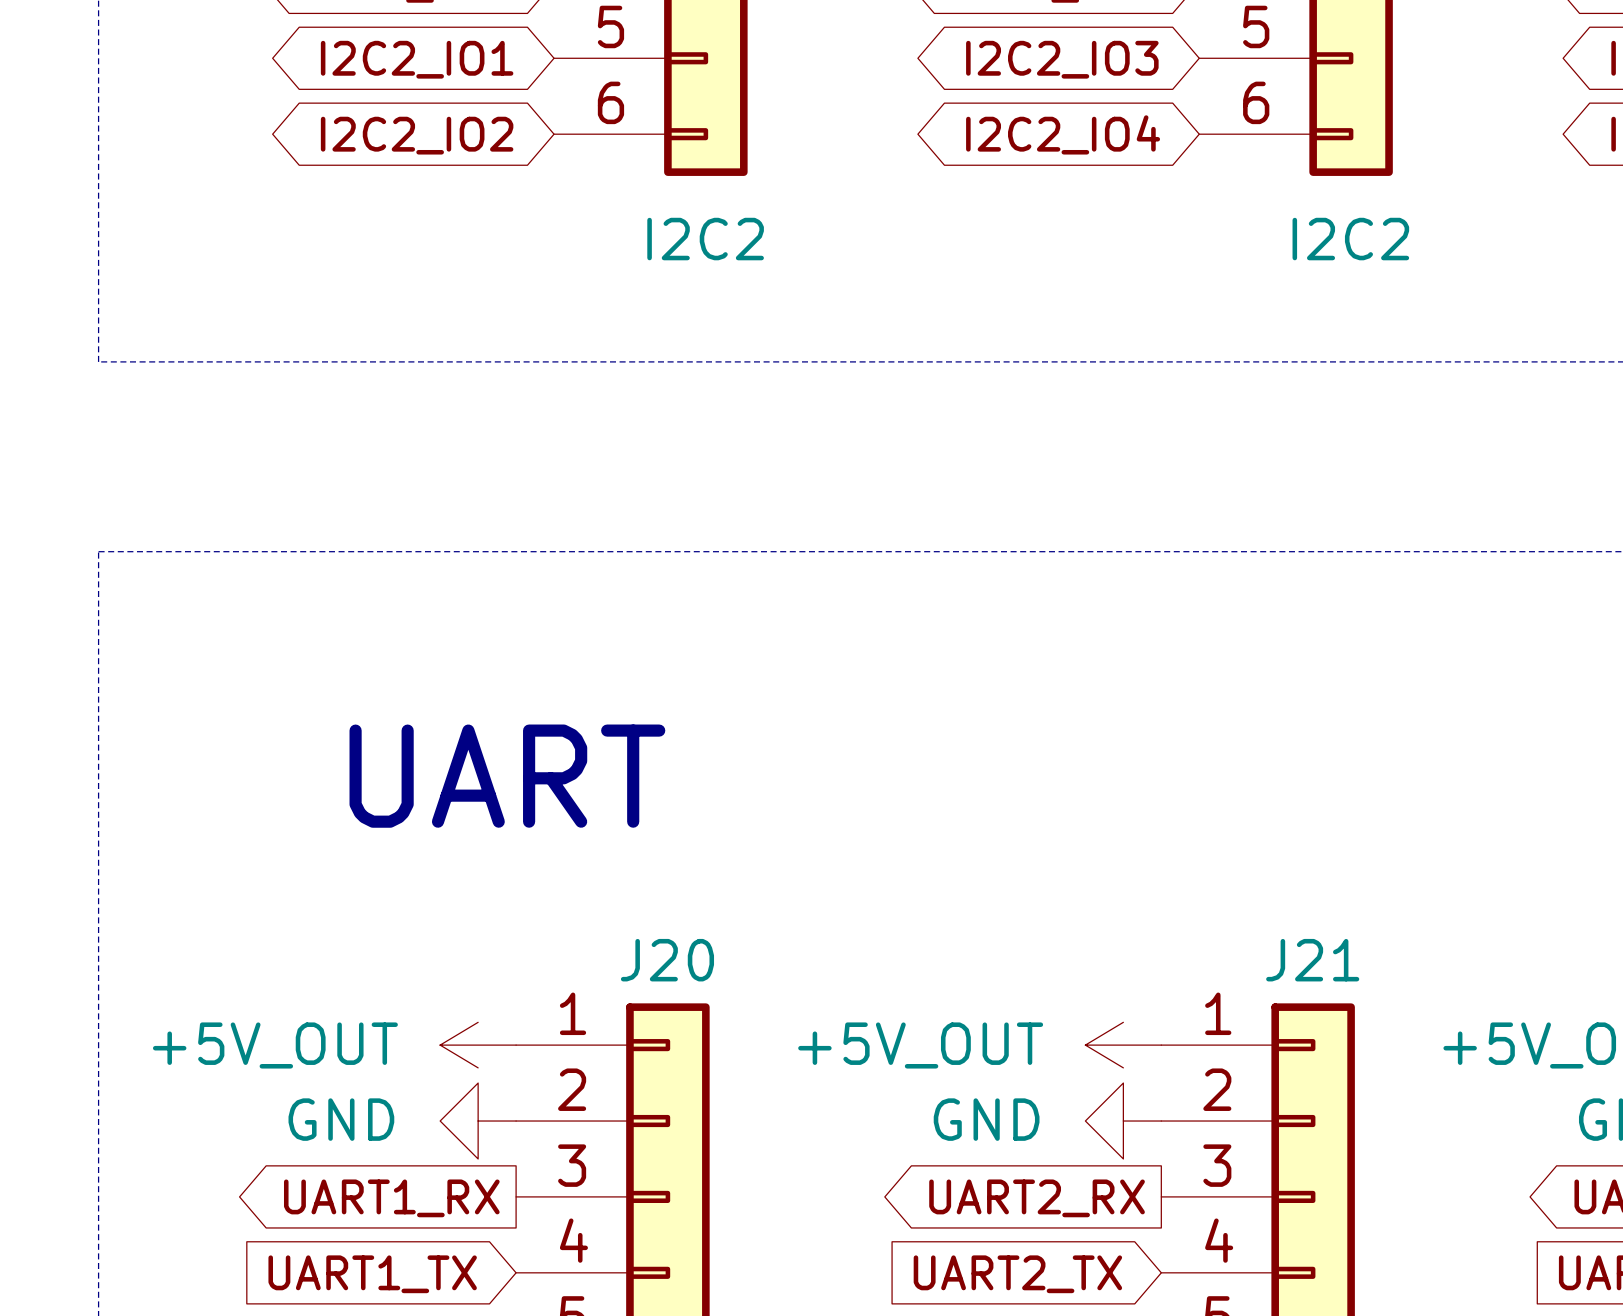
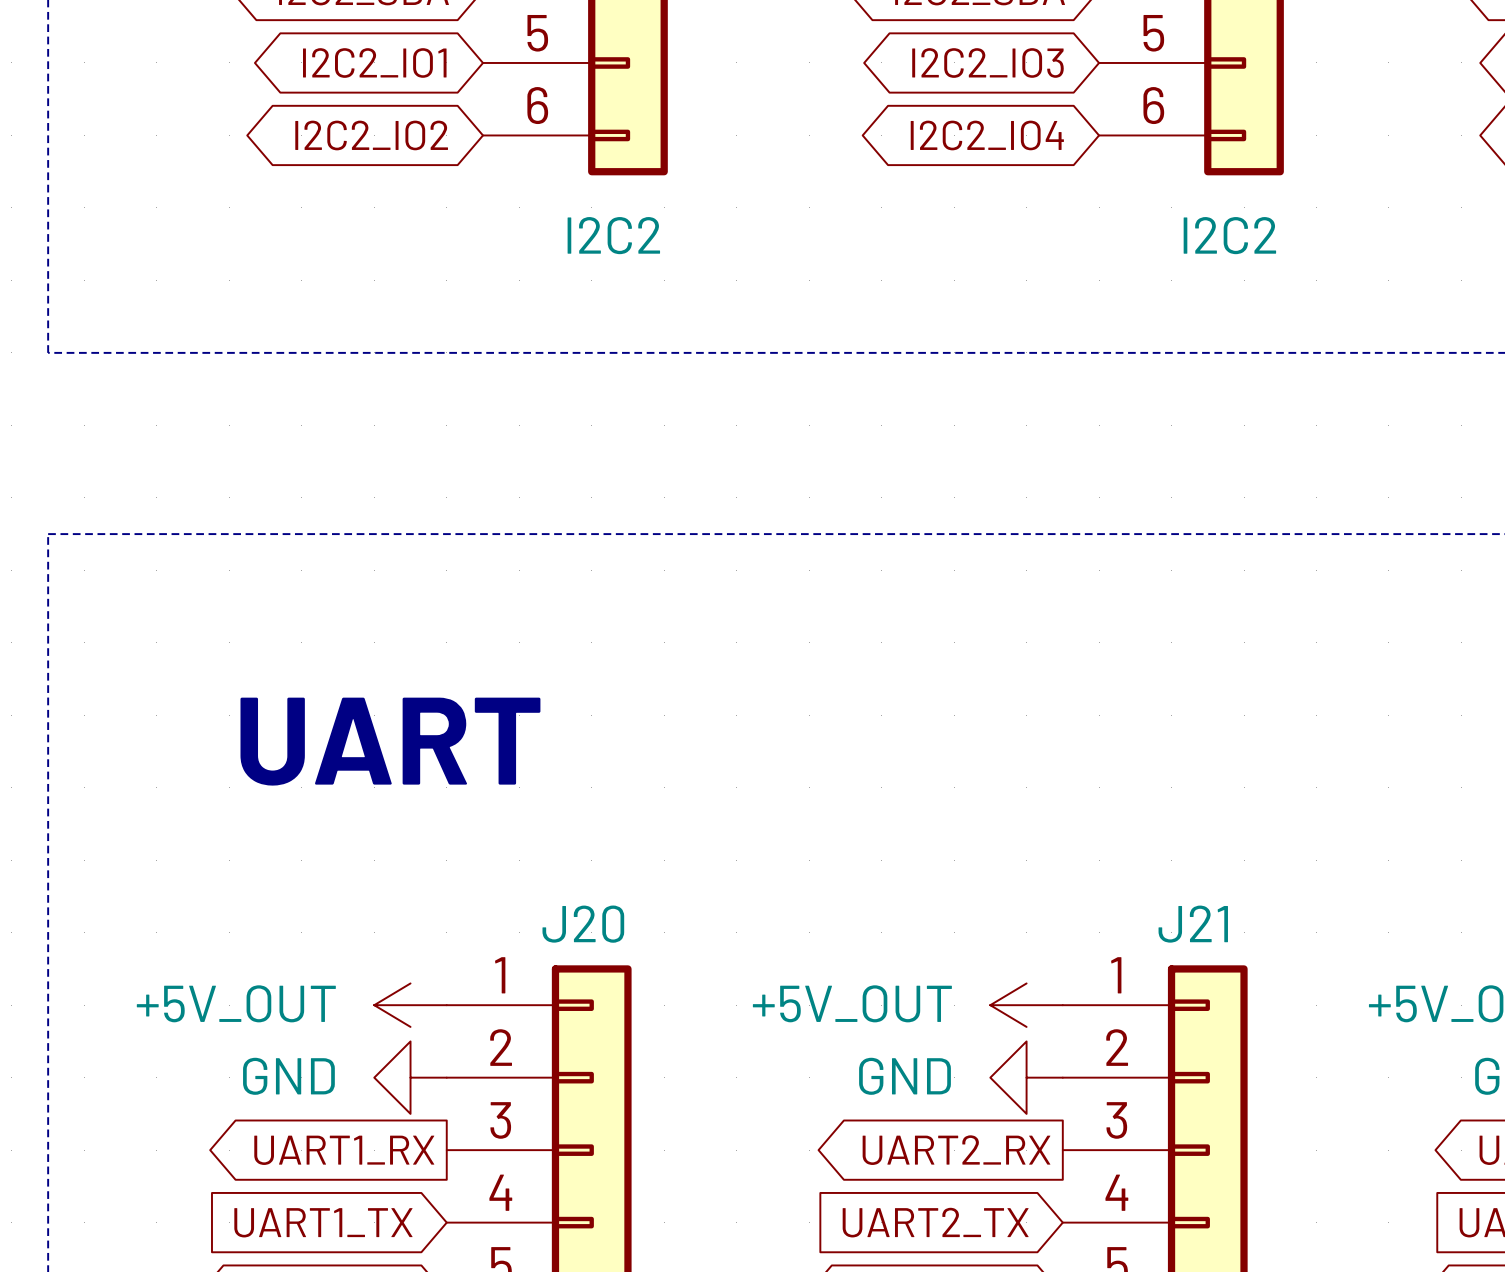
text position: UART (507, 776) -> UART (390, 741)

